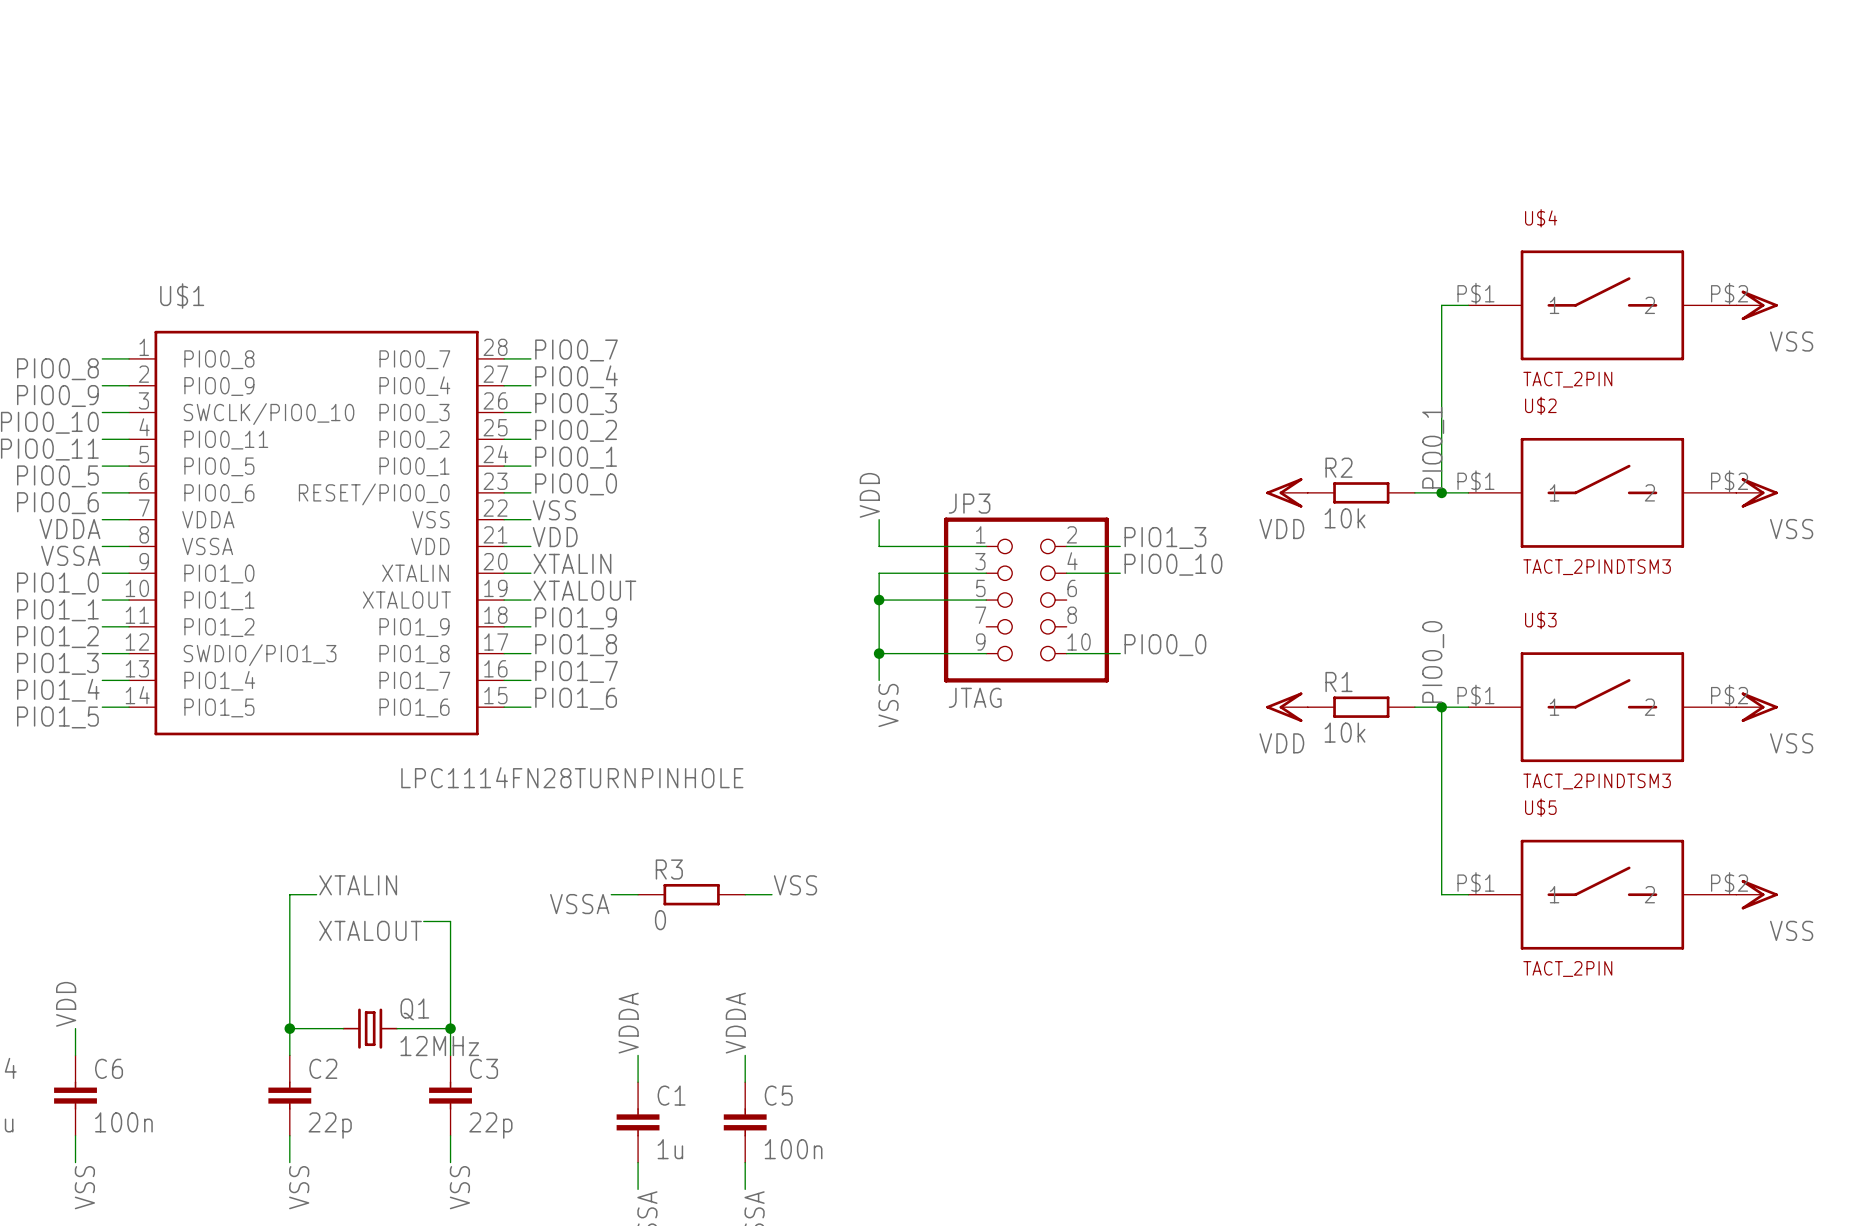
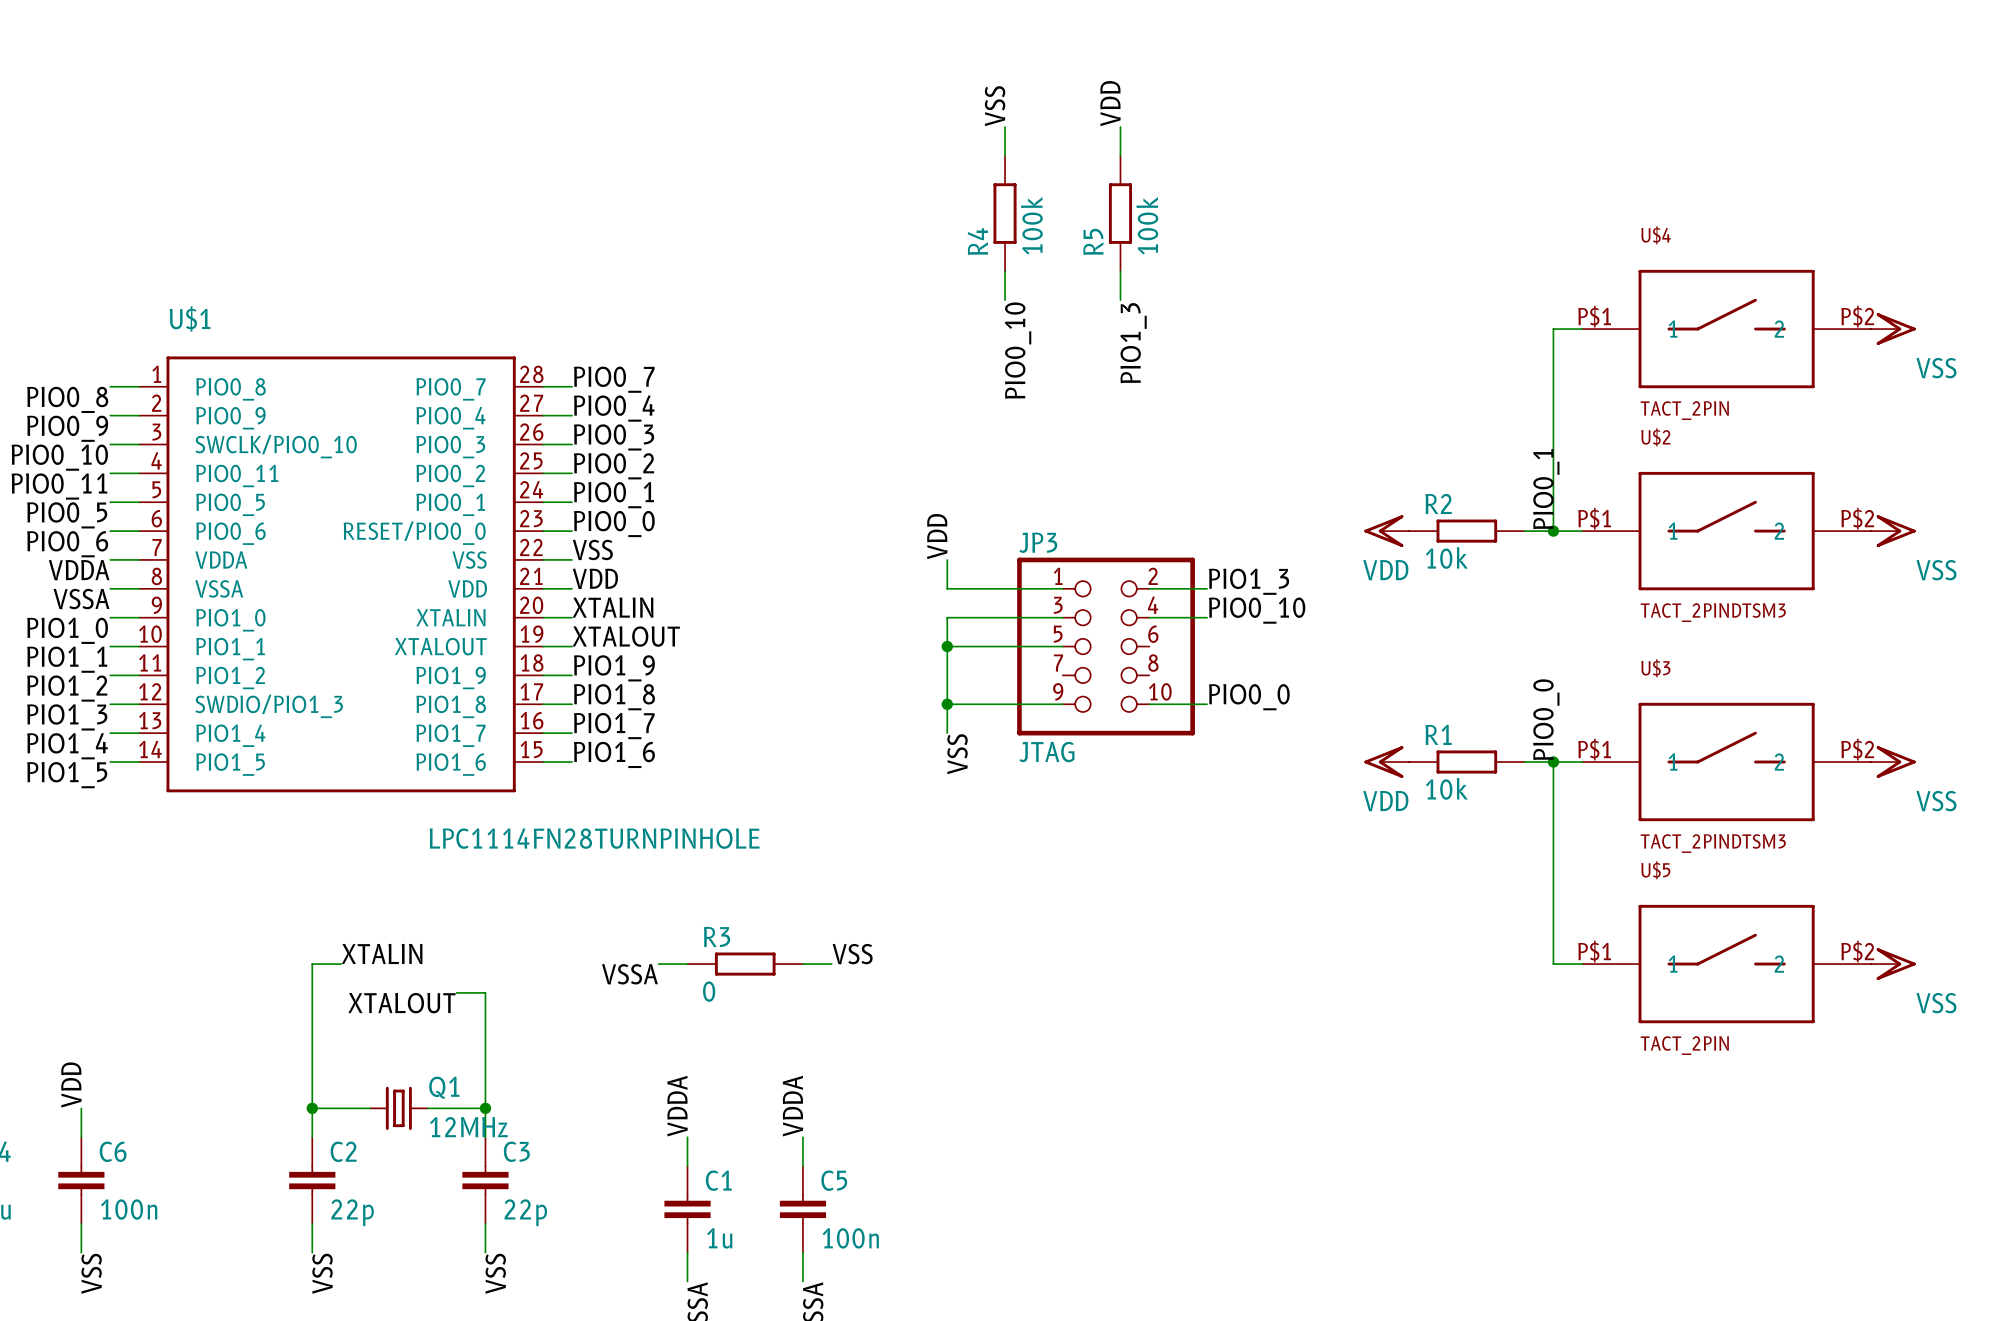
label: none -> VDD (1110, 103)
label: none -> VSS (995, 106)
wire: none -> (1005, 126) (1005, 155)
wire: none -> (1120, 126) (1120, 155)
R4: none -> 100k (1005, 213)
R5: none -> 100k (1120, 213)
wire: none -> (1005, 271) (1005, 300)
wire: none -> (1120, 271) (1120, 300)
label: none -> PIO1_3 (1133, 343)
label: none -> PIO0_10 (1018, 350)

